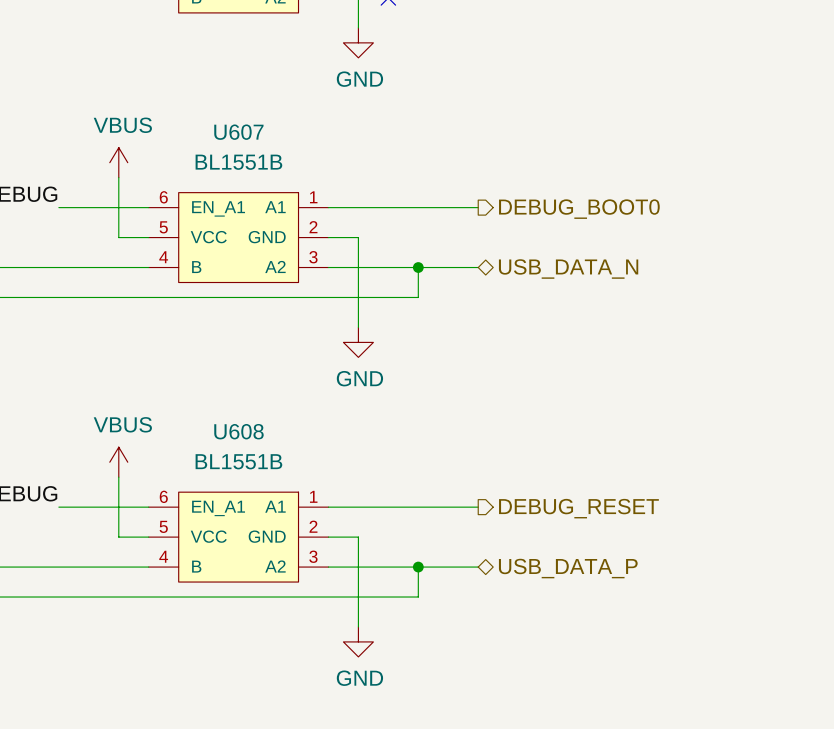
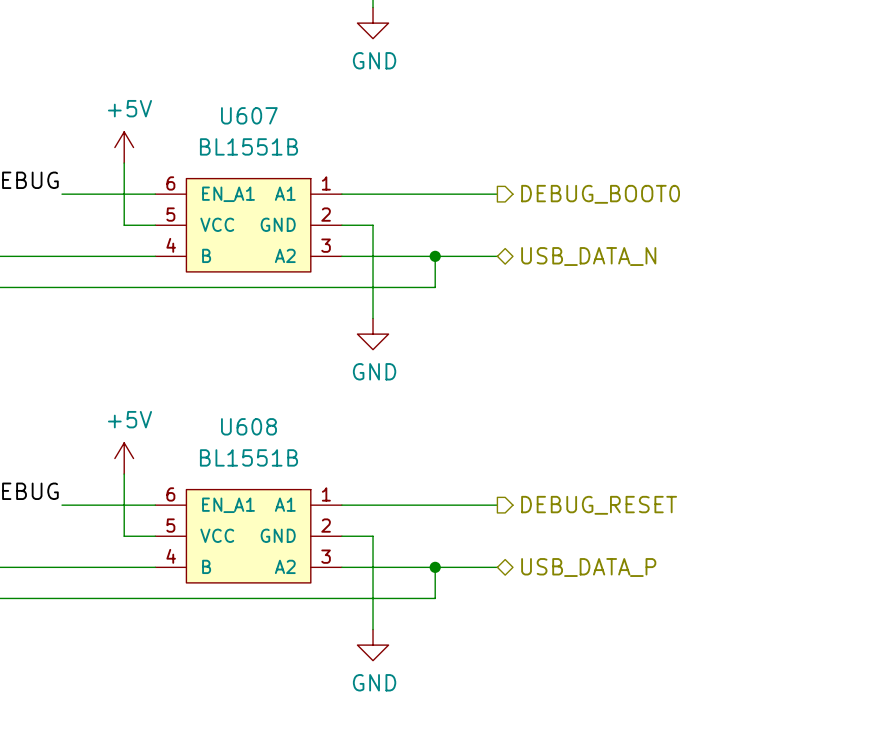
power symbol: VBUS (118, 162) -> +5V (124, 147)
power symbol: VBUS (118, 462) -> +5V (124, 458)

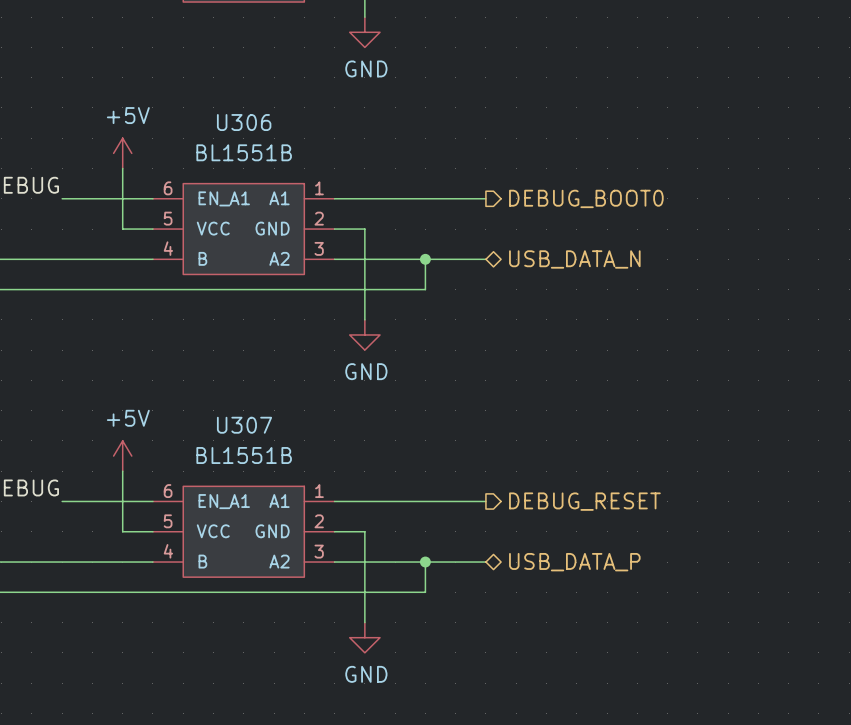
U607 name: U607 (249, 115) -> U306 (244, 122)
U608 name: U608 (248, 426) -> U307 (244, 425)

